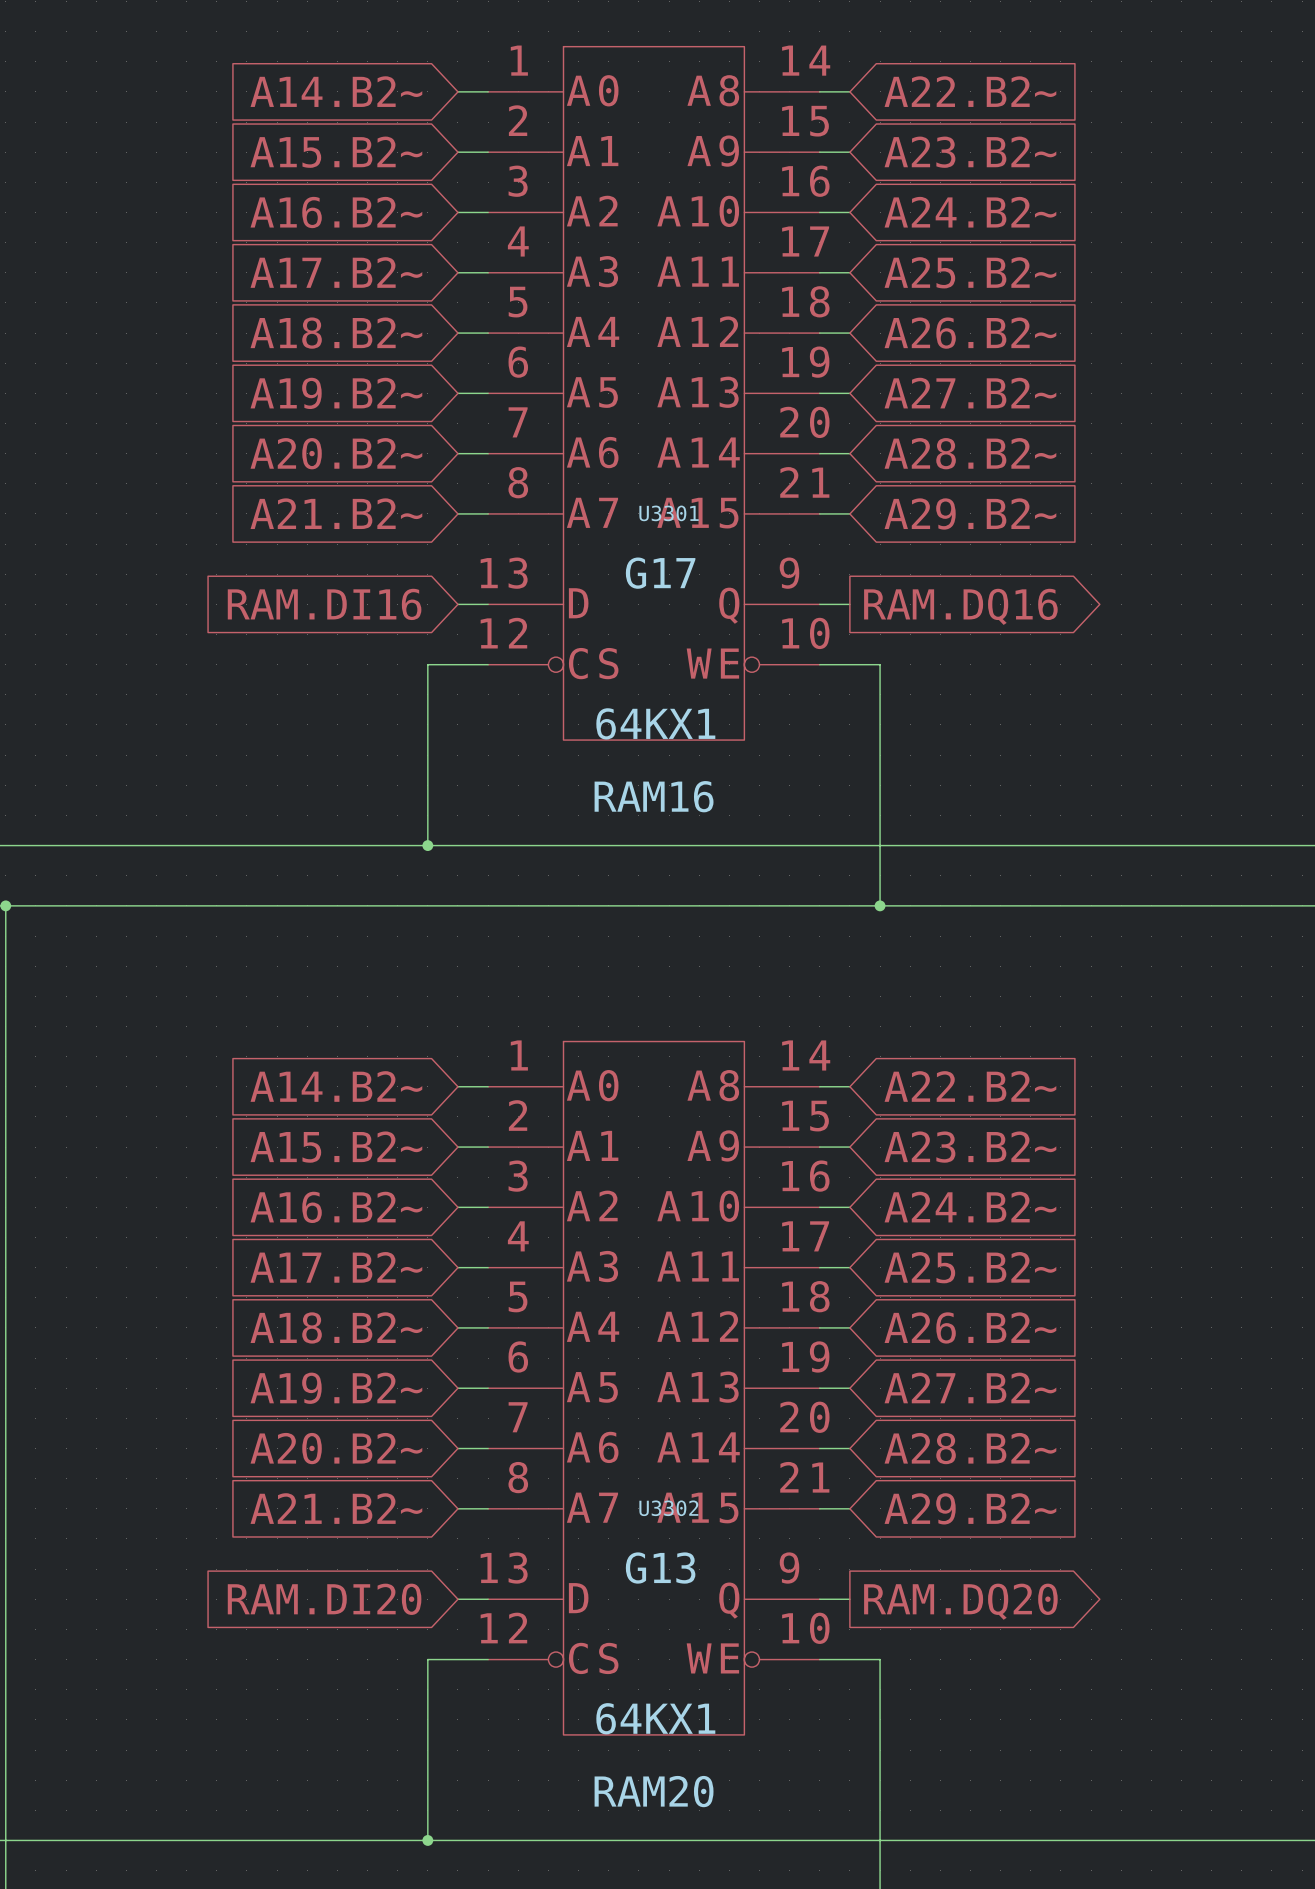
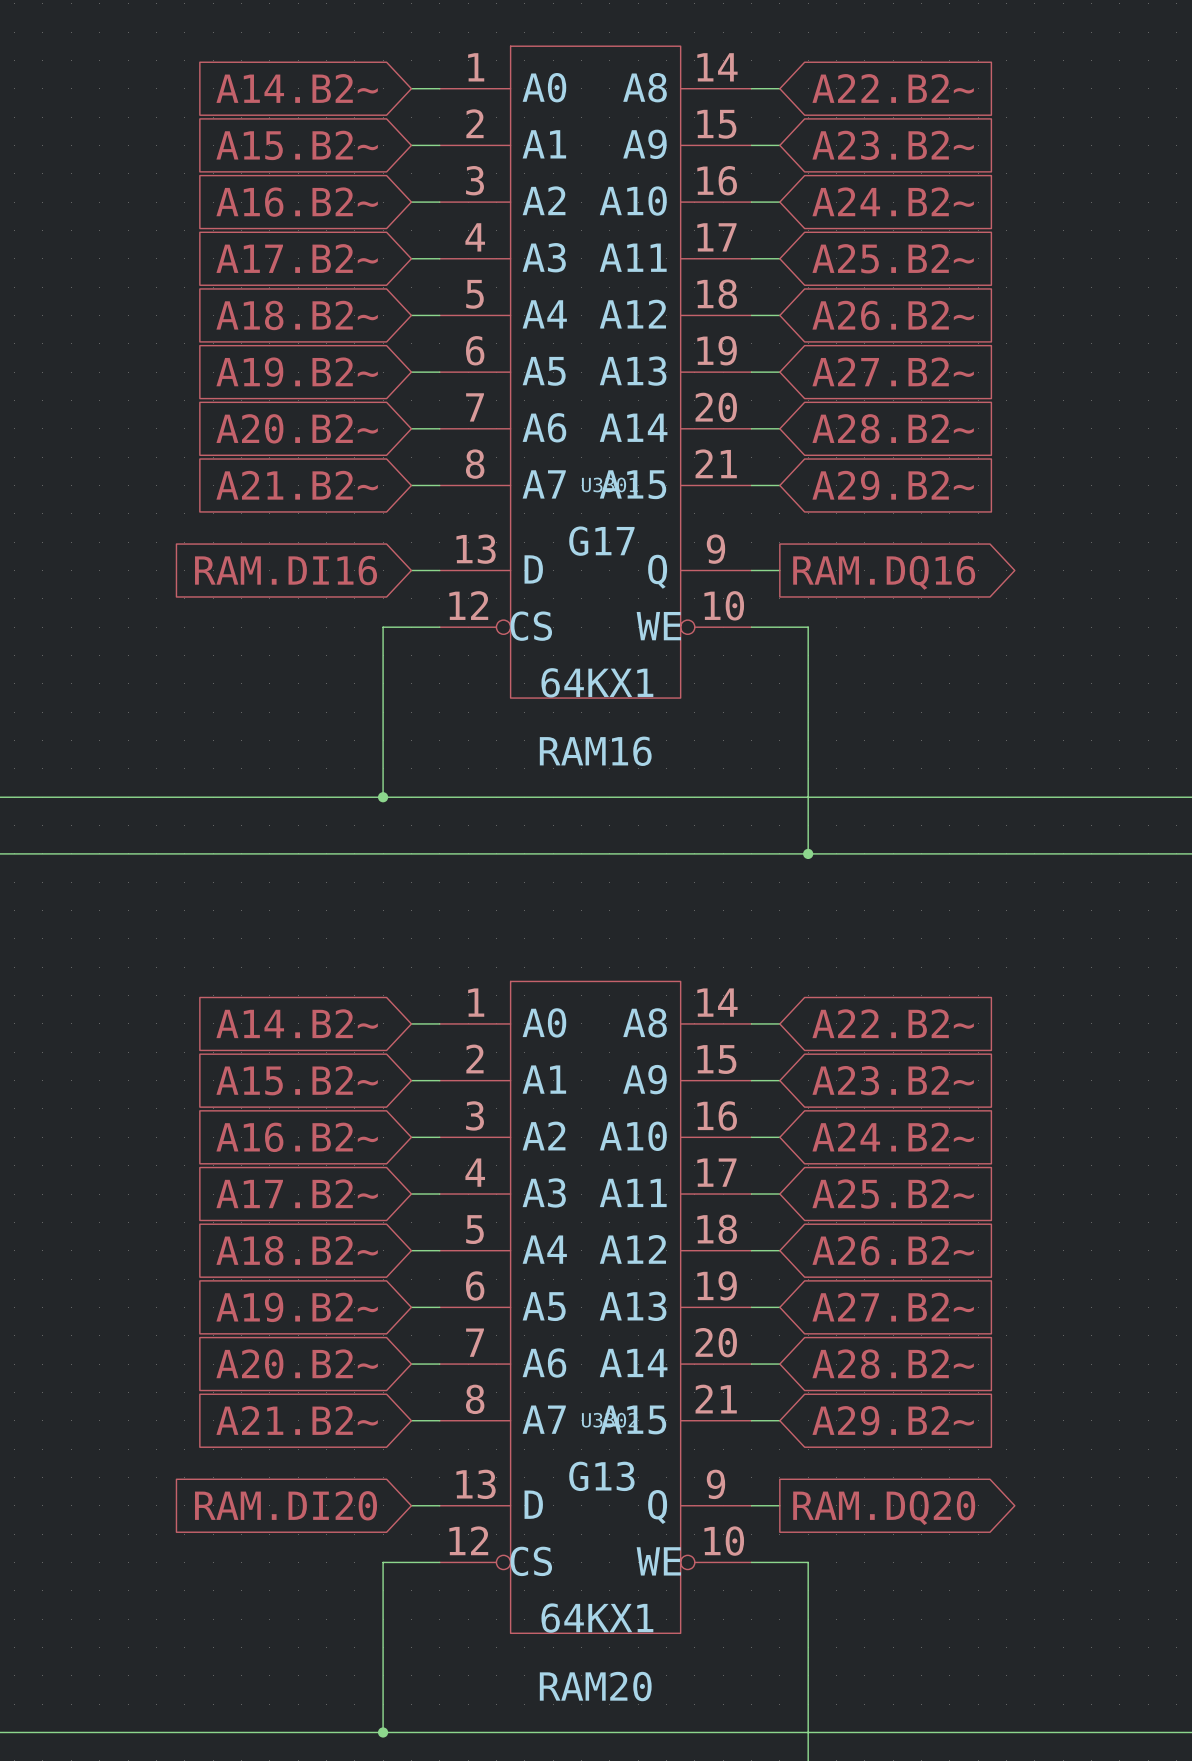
U3301 symbol: [488, 46, 820, 741] -> [439, 46, 752, 699]
U3302 symbol: [488, 1041, 820, 1735] -> [439, 981, 752, 1634]

